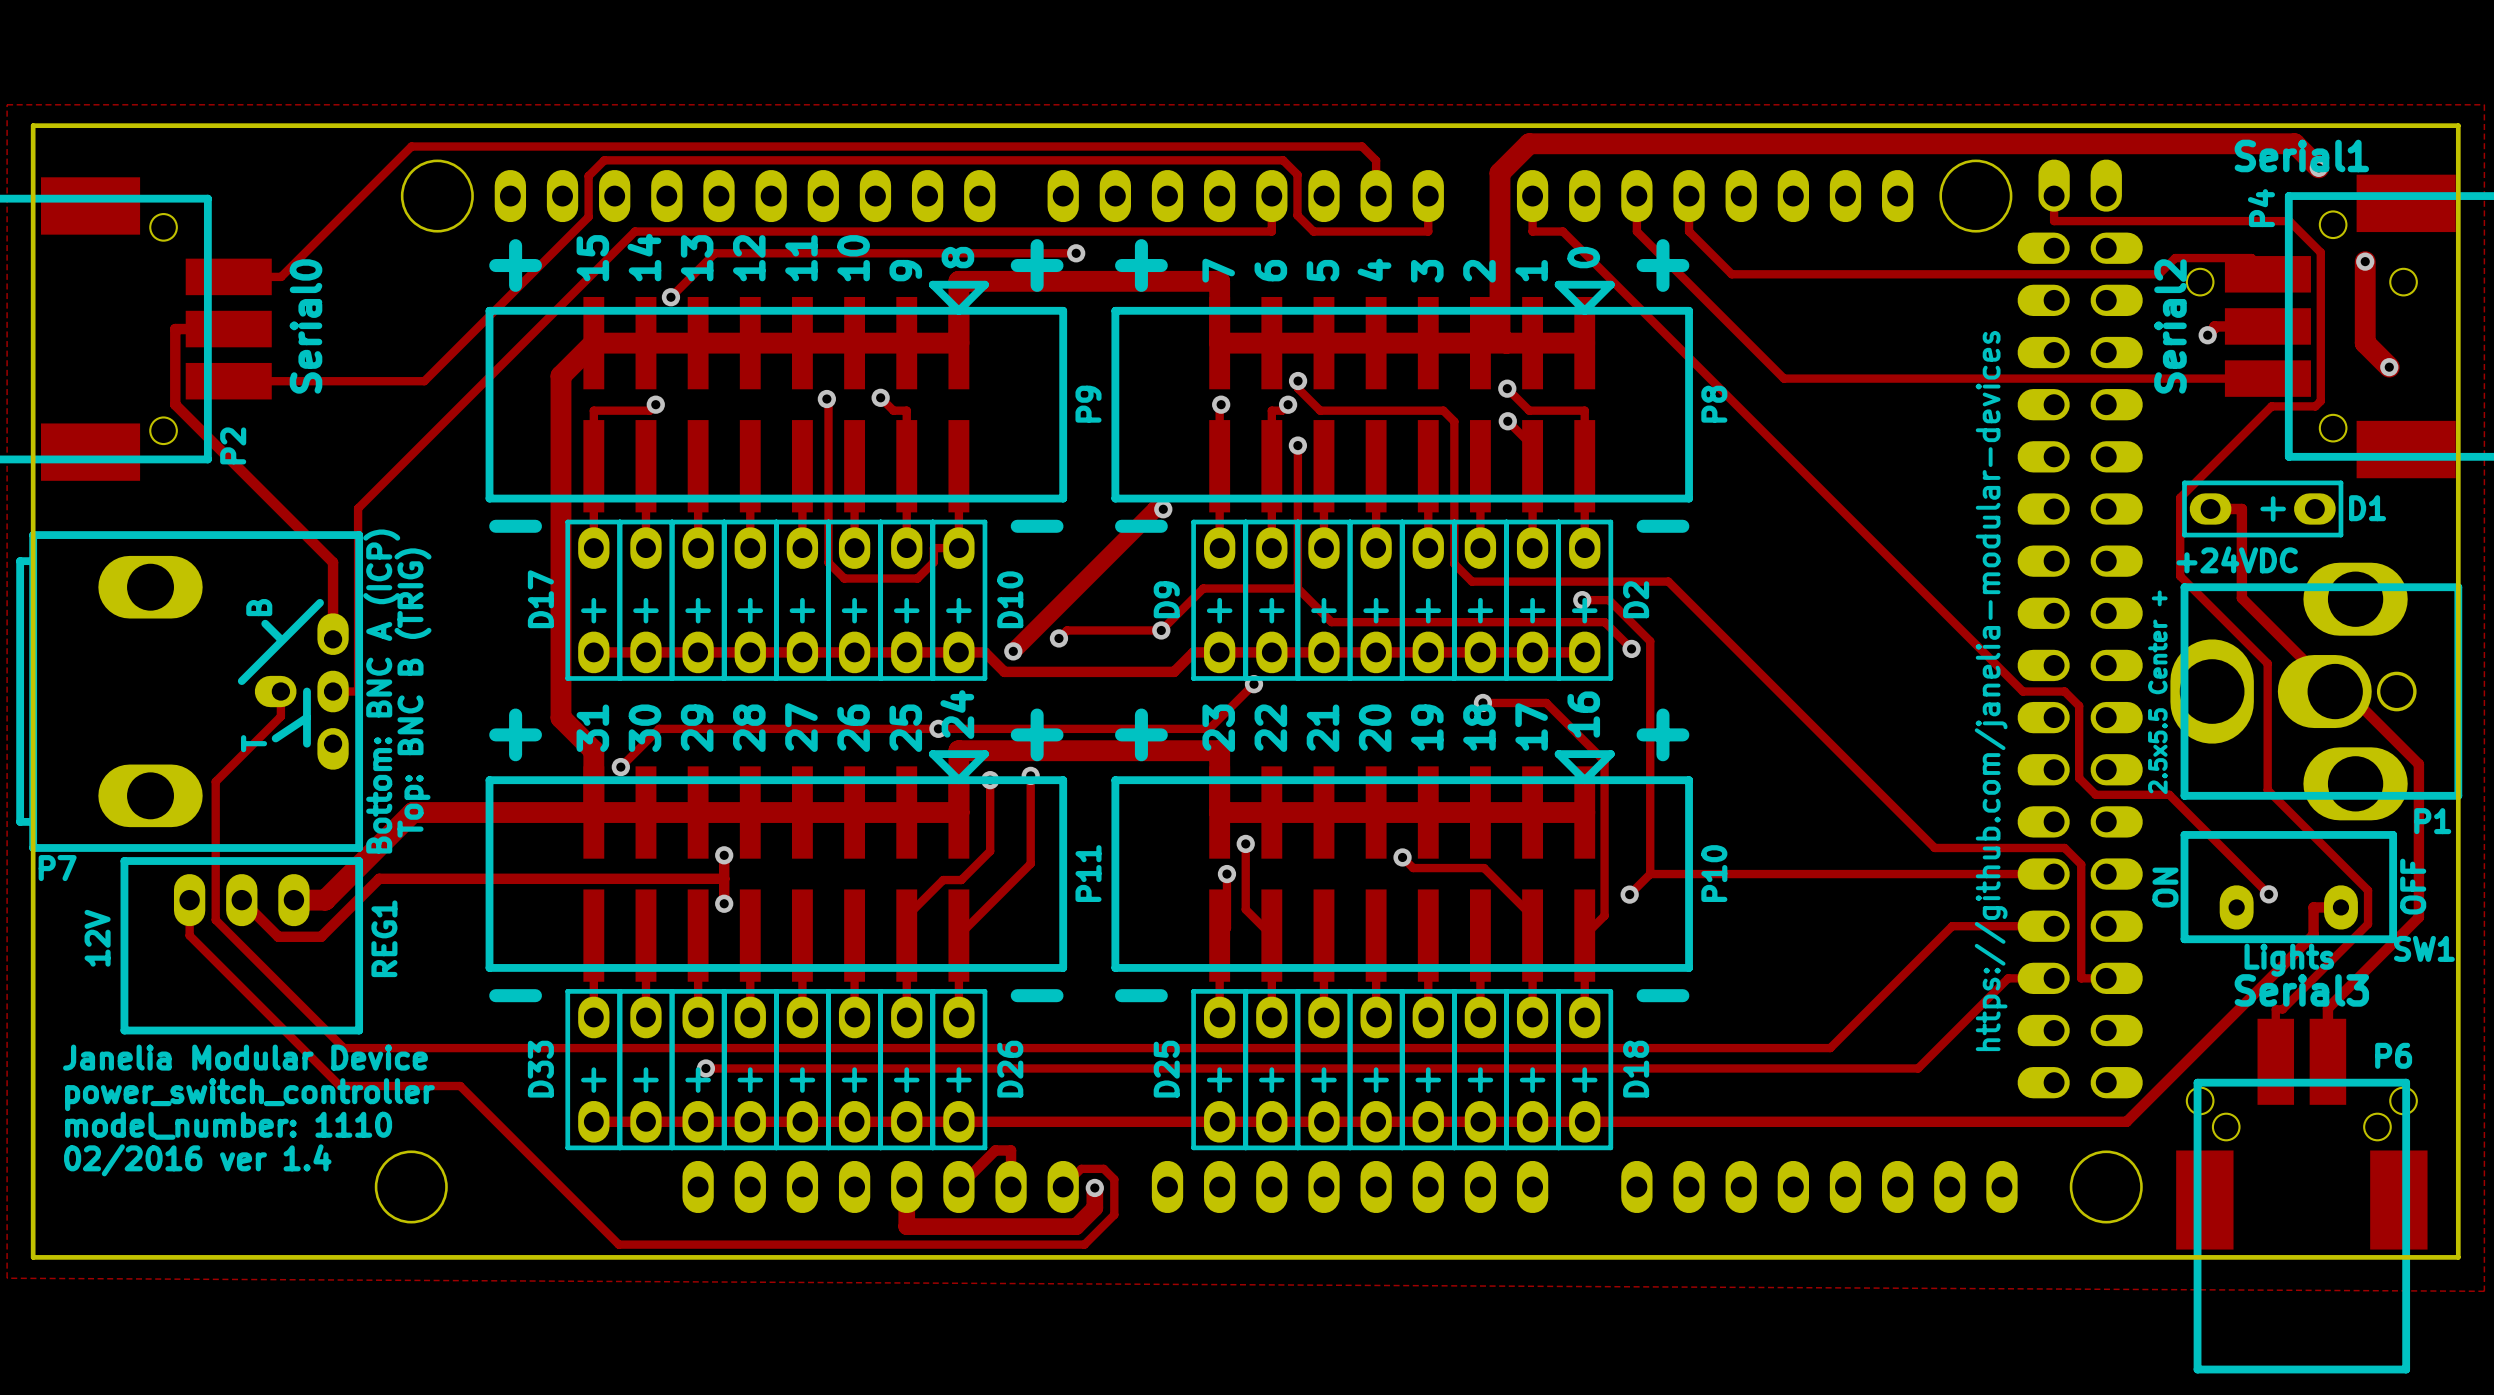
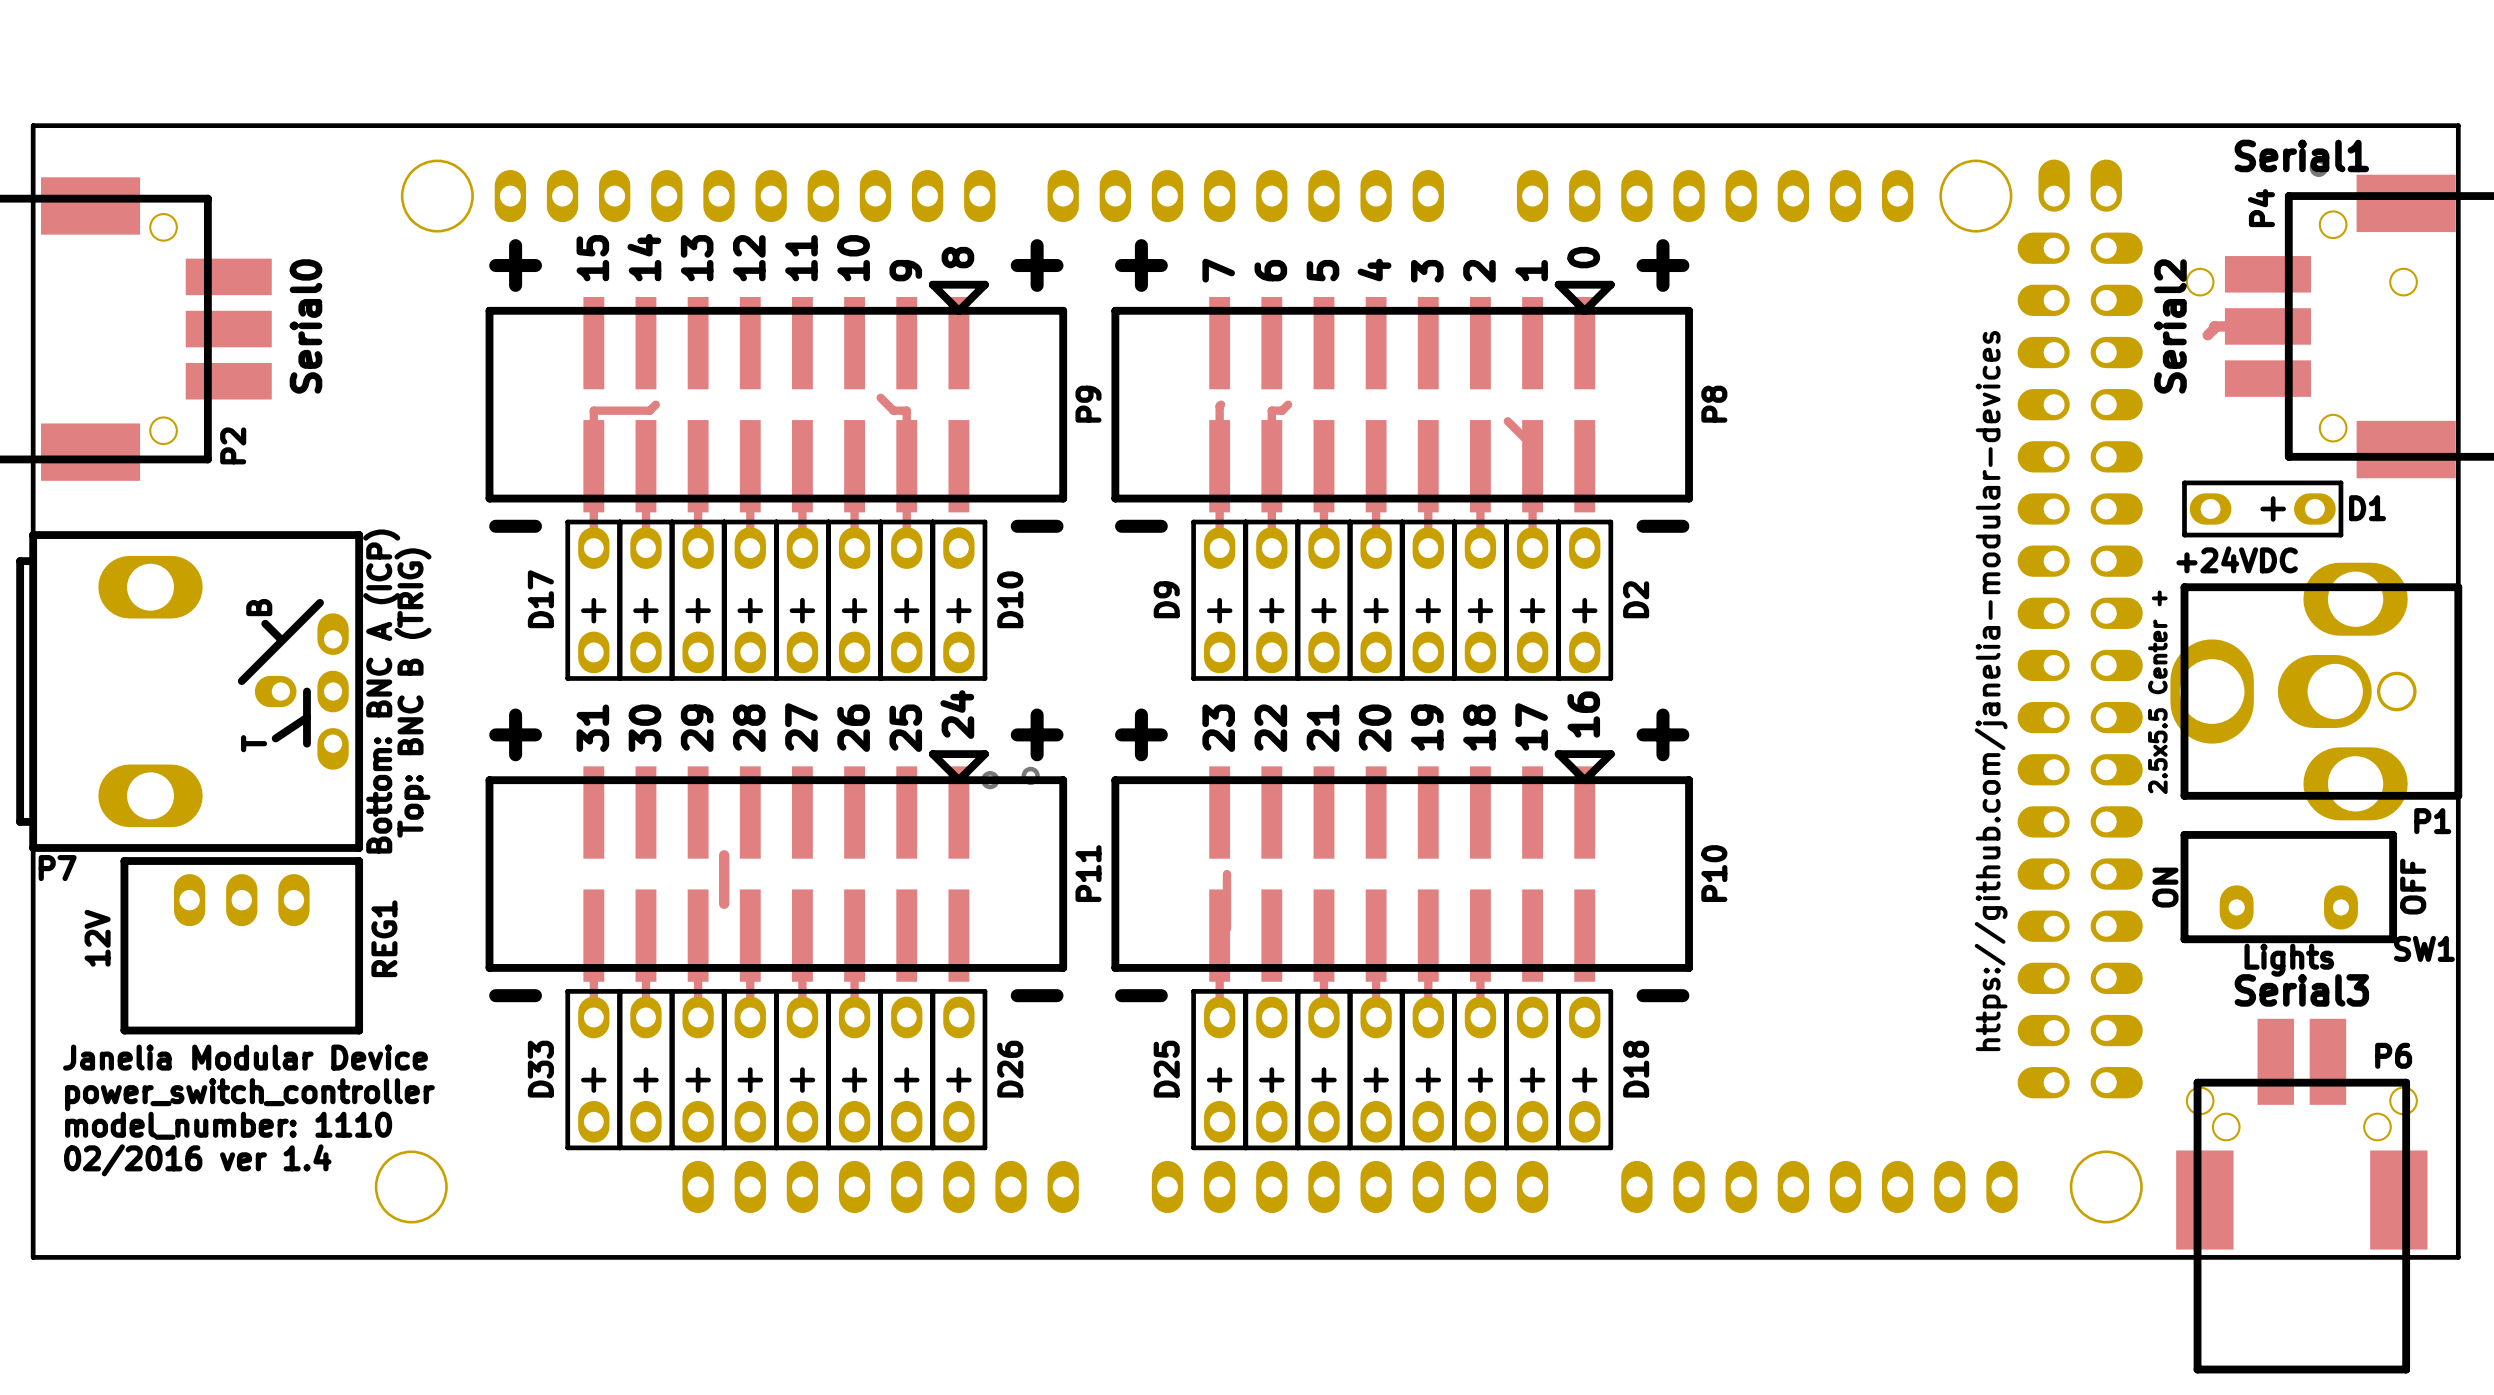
zone outline: (7, 104) (7, 1278) (2484, 1291) (2484, 104) (7, 104) -> none
track: (2318, 167) (2294, 143) (1529, 143) (1499, 173) (1499, 336) (1506, 343) -> none
track: (1271, 196) (1271, 231) (635, 231) (358, 508) (358, 691) (333, 691) -> none
track: (1376, 196) (1376, 160) (1362, 146) (411, 146) (281, 276) (228, 276) -> none
track: (1428, 196) (1428, 231) (1313, 231) (1297, 215) (1297, 174) (1283, 160) (604, 160) (588, 176) (588, 216) (424, 381) (228, 381) -> none
track: (1532, 196) (1532, 231) (1562, 231) (2022, 691) (2064, 691) (2079, 706) (2079, 778) (2095, 794) (2169, 794) (2268, 894) -> none
track: (1636, 196) (1636, 231) (1783, 378) (2267, 378) -> none
track: (1689, 196) (1689, 231) (1731, 274) (2158, 274) (2175, 258) (2251, 258) (2267, 274) -> none
track: (2054, 196) (2054, 221) (2289, 221) (2320, 252) (2320, 401) (2315, 406) (2271, 406) (2180, 497) (2180, 576) (2267, 663) (2267, 790) (2368, 890) (2368, 924) (2282, 1009) (2275, 1009) (2275, 1061) -> none
track: (1076, 253) (714, 253) (670, 297) -> none
via: (1076, 253) -> none
track: (2365, 261) (2365, 343) (2389, 367) -> none
via: (2365, 261) -> none
via: (670, 297) -> none
track: (228, 329) (175, 329) (175, 404) (333, 562) (333, 639) -> none
via: (2207, 335) -> none
track: (1584, 343) (1219, 343) (1219, 281) (958, 281) (958, 343) (593, 343) (560, 375) (560, 717) (593, 750) (593, 812) -> none
via: (2389, 367) -> none
track: (1298, 381) (1298, 388) (1320, 410) (1443, 410) (1454, 421) (1454, 563) (1472, 581) (1668, 581) (1934, 847) (2064, 847) (2081, 864) (2081, 978) (2106, 978) -> none
via: (1298, 381) -> none
track: (1507, 388) (1529, 410) (1584, 410) (1584, 548) -> none
via: (1507, 388) -> none
via: (880, 397) -> none
track: (826, 399) (828, 400) (828, 562) (844, 578) (917, 578) (933, 562) (933, 548) (958, 548) (958, 466) -> none
via: (826, 399) -> none
via: (655, 404) -> none
via: (1221, 404) -> none
via: (1288, 404) -> none
via: (1507, 421) -> none
track: (1297, 445) (1297, 588) -> none
via: (1297, 445) -> none
track: (2210, 508) (2241, 508) (2241, 598) (2335, 691) (2346, 691) (2418, 764) (2418, 917) (2327, 1008) (2327, 1061) -> none
track: (1163, 509) (1155, 509) (1013, 651) -> none
via: (1163, 509) -> none
track: (1297, 588) (1331, 622) (1604, 622) (1631, 648) -> none
track: (1297, 588) (1203, 588) (1161, 630) (1066, 630) (1058, 638) -> none
track: (1582, 600) (1609, 600) (1650, 641) (1650, 874) -> none
via: (1582, 600) -> none
via: (1161, 630) -> none
via: (1058, 638) -> none
via: (1631, 648) -> none
via: (1013, 651) -> none
track: (593, 652) (984, 652) (1004, 671) (1174, 671) (1193, 652) (1584, 652) -> none
track: (1254, 684) (1209, 728) (659, 728) (620, 767) -> none
via: (1254, 684) -> none
track: (280, 691) (280, 716) (215, 781) (215, 919) (343, 1048) (1830, 1048) (1952, 926) (2054, 926) -> none
track: (1482, 702) (1546, 702) (1604, 761) (1604, 915) (1584, 935) (1584, 1017) -> none
via: (1482, 702) -> none
via: (938, 728) -> none
via: (620, 767) -> none
track: (1030, 775) (1030, 863) (958, 935) (958, 1017) -> none
track: (990, 780) (990, 851) (961, 880) (943, 880) (906, 916) (906, 1017) -> none
track: (1584, 812) (1219, 812) (1219, 750) (958, 750) (958, 812) (412, 812) (325, 900) (293, 900) -> none
track: (1245, 843) (1245, 909) (1271, 935) (1271, 1017) -> none
via: (1245, 843) -> none
via: (724, 855) -> none
track: (1402, 857) (1413, 868) (1484, 868) (1532, 916) (1532, 1017) -> none
via: (1402, 857) -> none
via: (1226, 874) -> none
track: (1650, 874) (2054, 874) -> none
track: (1650, 874) (1629, 894) -> none
track: (724, 878) (379, 878) (321, 936) (278, 936) (241, 900) -> none
via: (1629, 894) -> none
via: (2268, 894) -> none
track: (189, 900) (189, 935) (340, 1086) (460, 1086) (618, 1244) (1084, 1244) (1114, 1214) (1114, 1179) (1103, 1168) (1081, 1168) (1063, 1186) -> none
via: (724, 903) -> none
track: (2340, 907) (2313, 907) (2313, 934) (2126, 1121) (593, 1121) -> none
track: (2054, 978) (2008, 978) (1918, 1068) (705, 1068) -> none
via: (705, 1068) -> none
track: (906, 1186) (906, 1226) (1076, 1226) (1094, 1208) (1094, 1187) -> none
track: (958, 1186) (995, 1150) (1011, 1150) (1011, 1186) -> none
via: (1094, 1187) -> none

